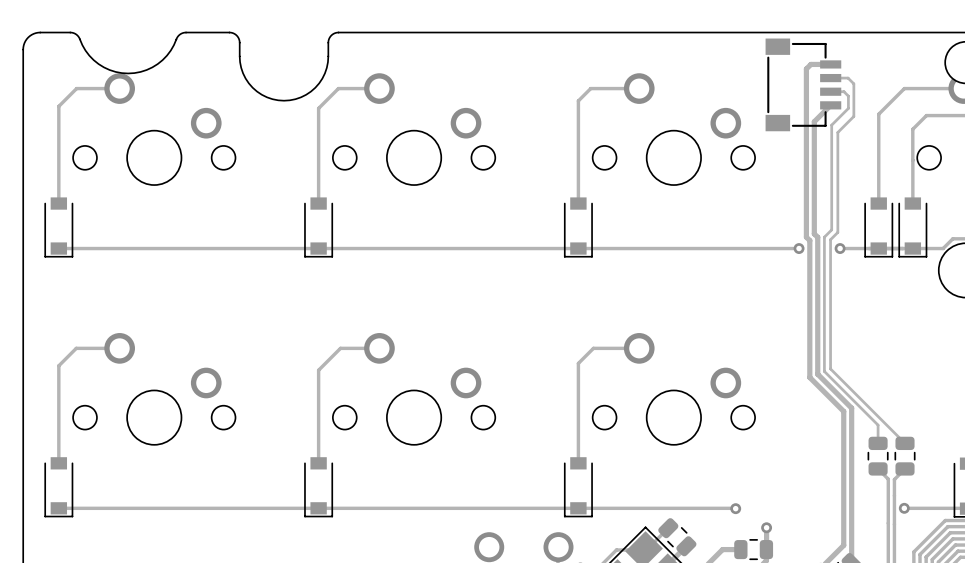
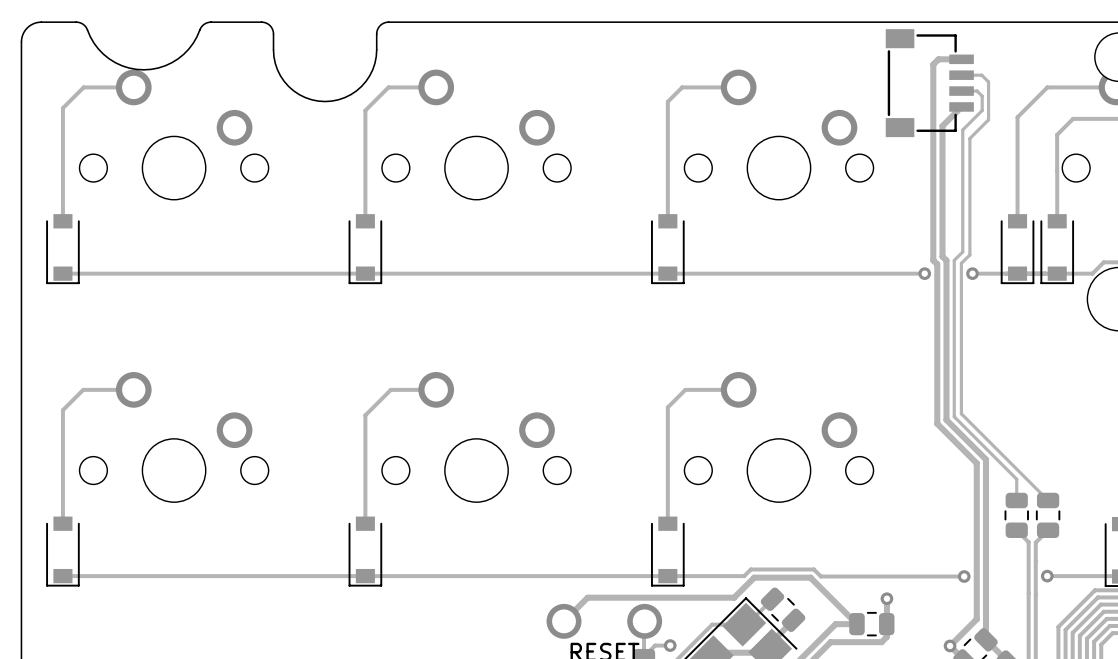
track: (644, 508) (735, 508) -> (744, 576) (750, 569) (813, 569) (820, 576) (964, 576)
via: (735, 508) -> none
via: none -> (964, 576)
track: none -> (564, 621) (587, 597) (734, 597) (754, 577) (810, 577) (856, 624)

